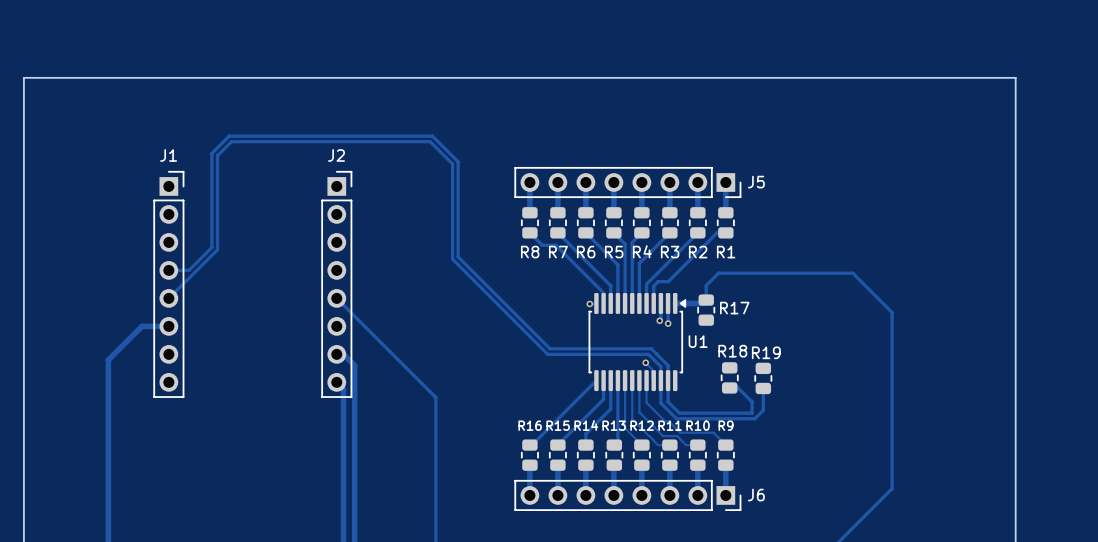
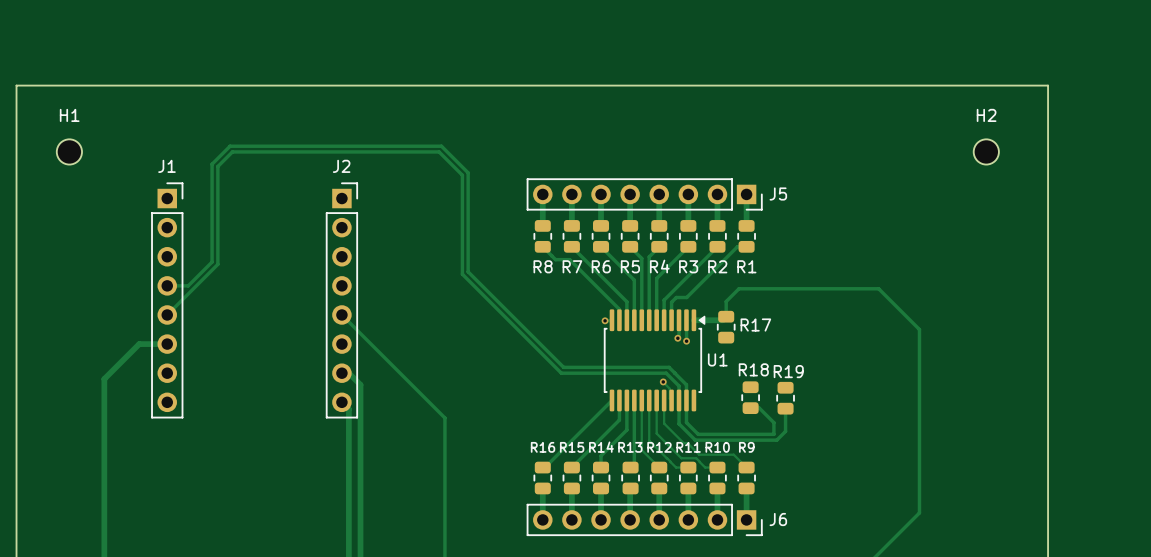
H1: none -> (69, 151)
H2: none -> (986, 151)

